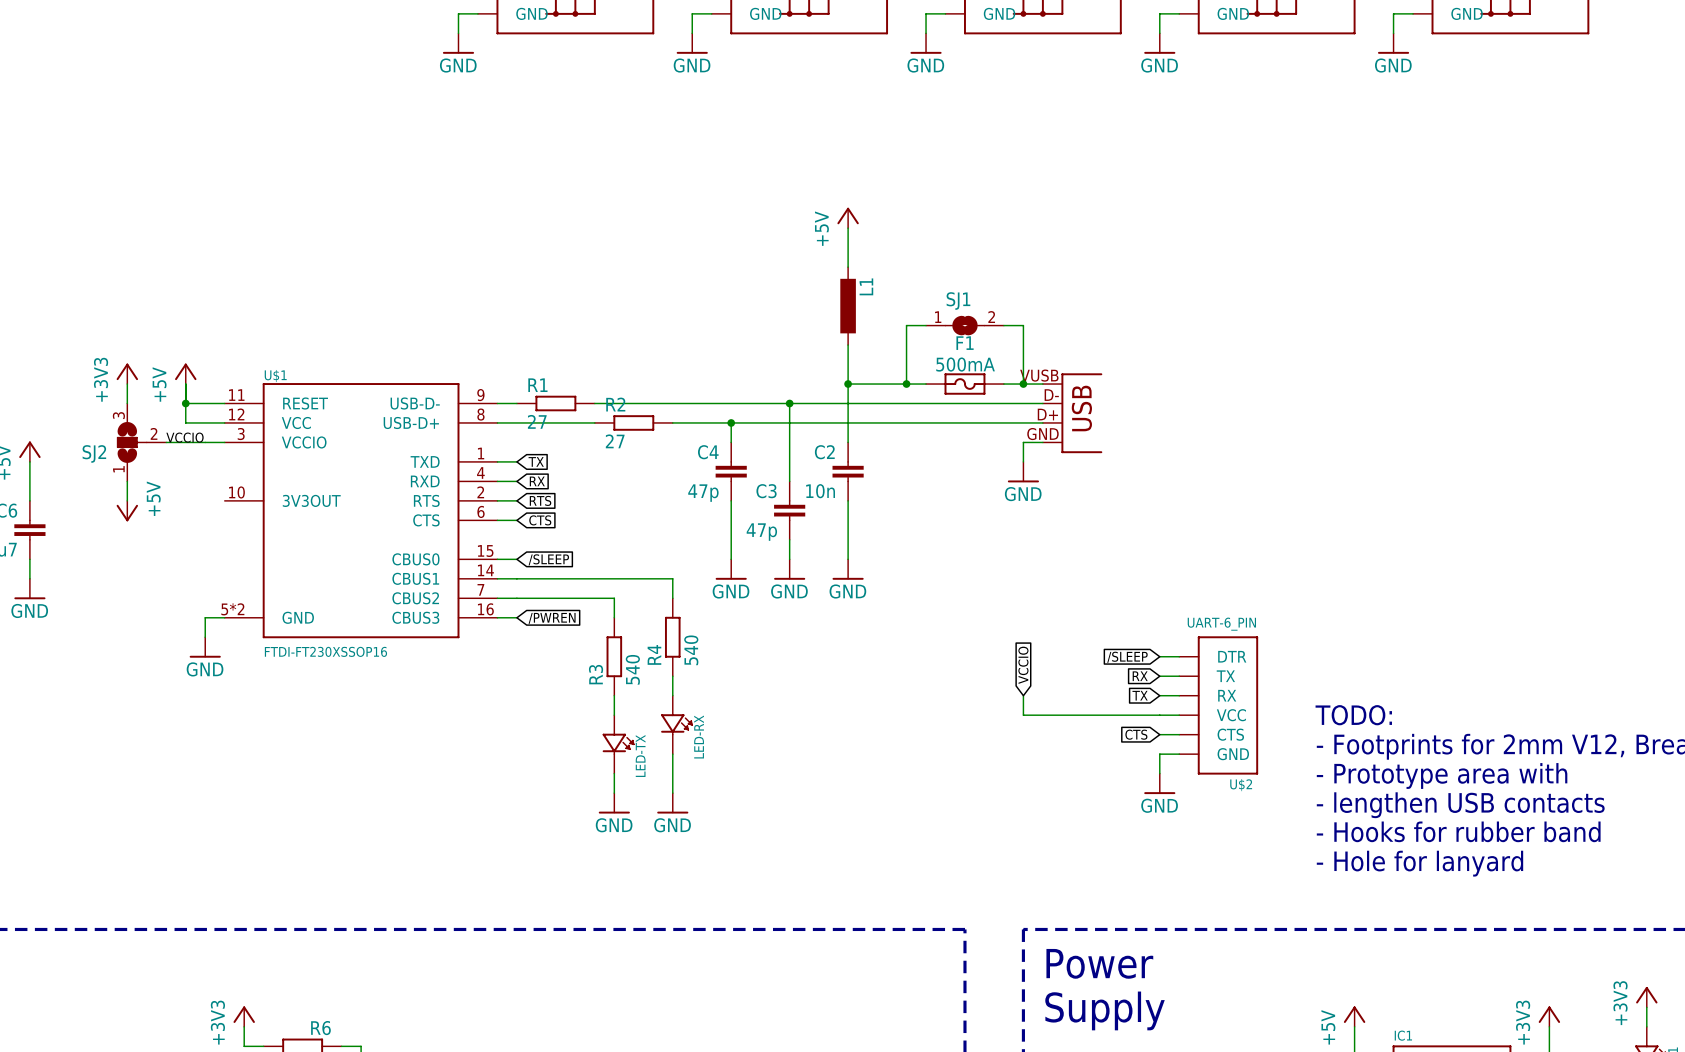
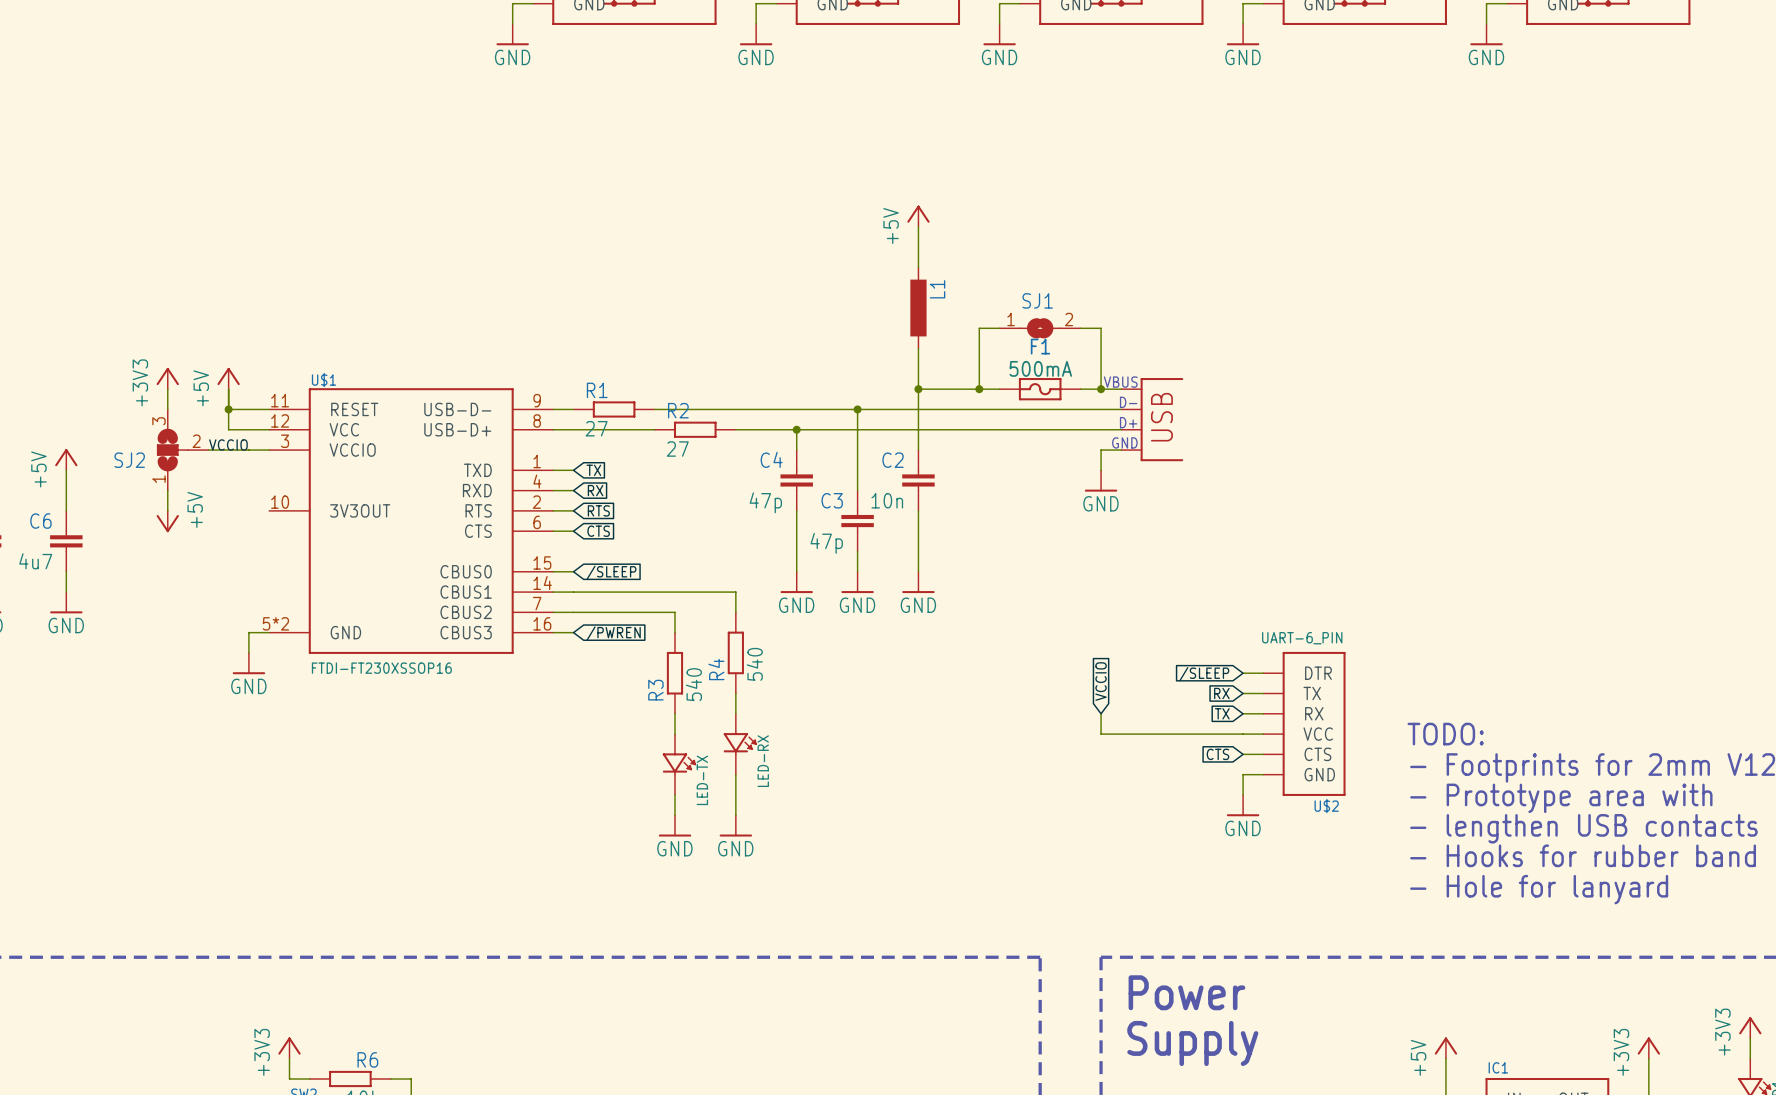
part pin number: VUSB (1039, 375) -> none
part text: none -> VBUS (1120, 382)
part pin number: D- (1051, 395) -> none
part text: none -> D- (1128, 402)
part pin number: D+ (1047, 414) -> none
part text: none -> D+ (1128, 422)
part pin number: GND (1042, 434) -> none
part text: none -> GND (1124, 442)

